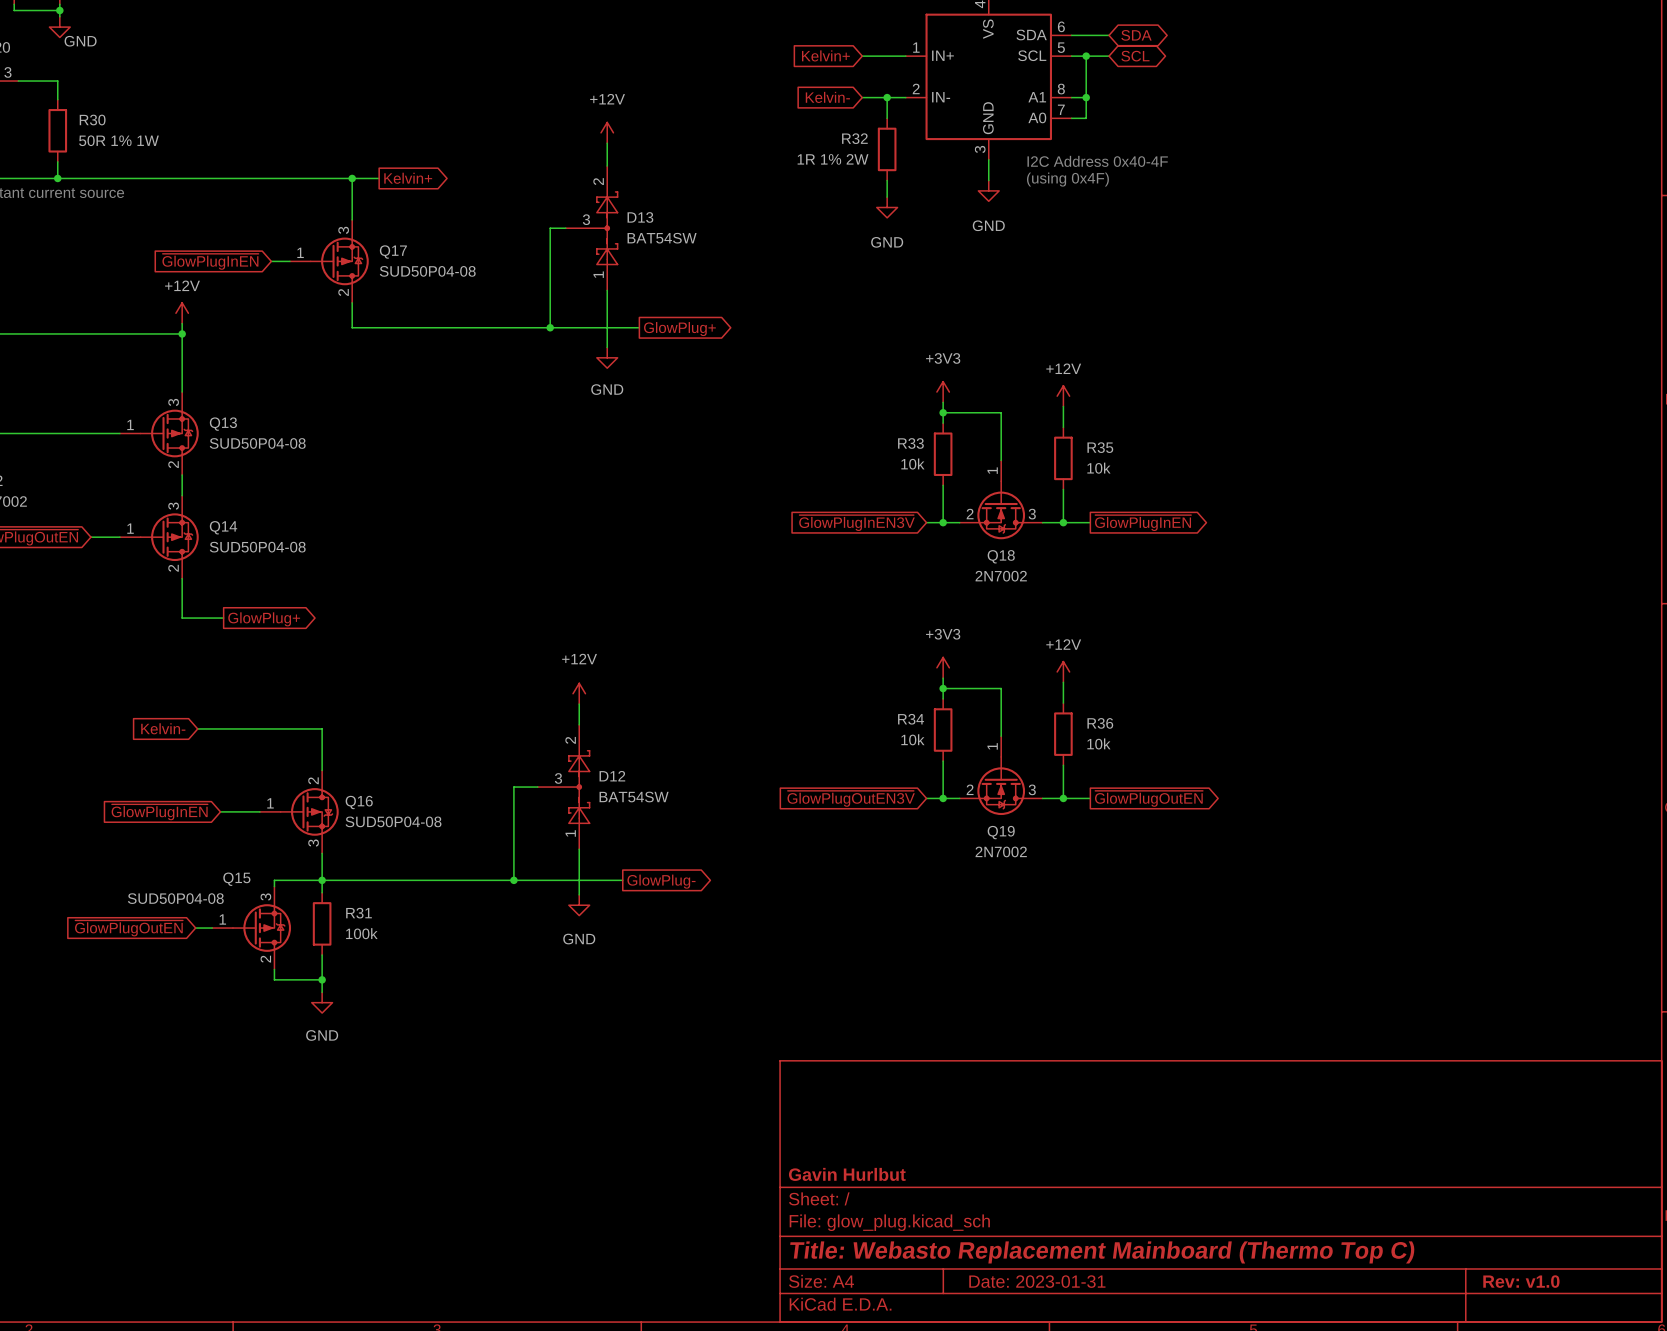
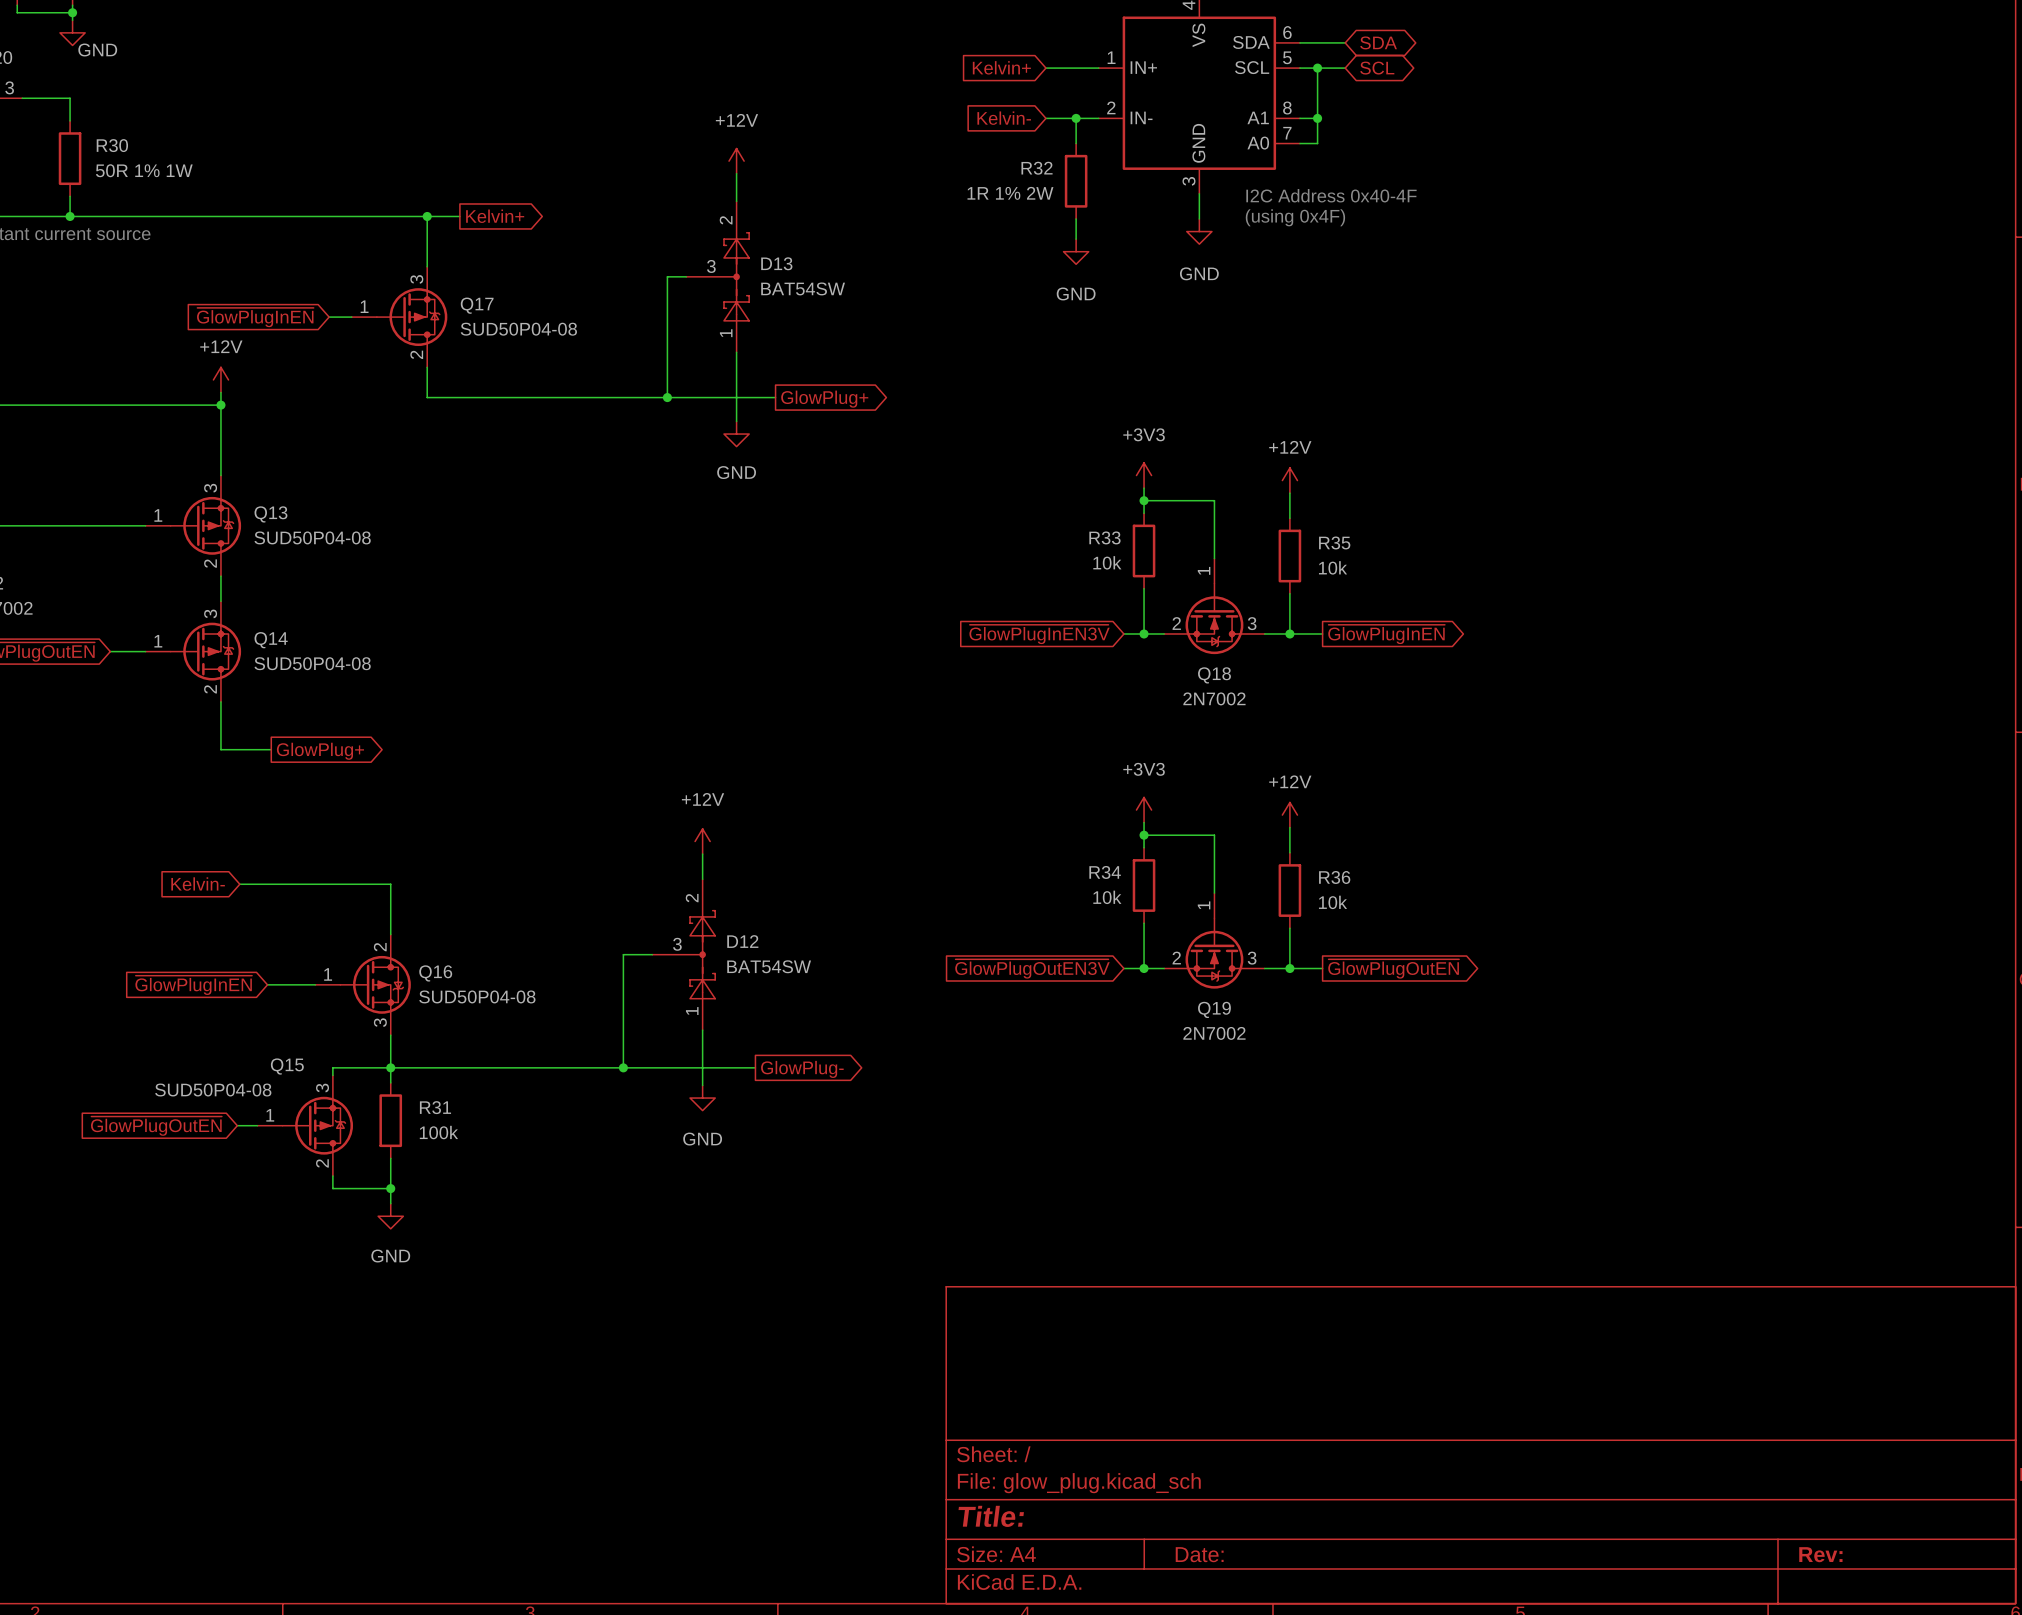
title block: Gavin Hurlbut (847, 1174) -> none
title block: Title: Webasto Replacement Mainboard (Thermo Top C) (1102, 1252) -> Title: (991, 1516)
title block: Date: 2023-01-31 (1037, 1281) -> Date: (1199, 1554)
title block: Rev: v1.0 (1521, 1281) -> Rev: (1820, 1554)

